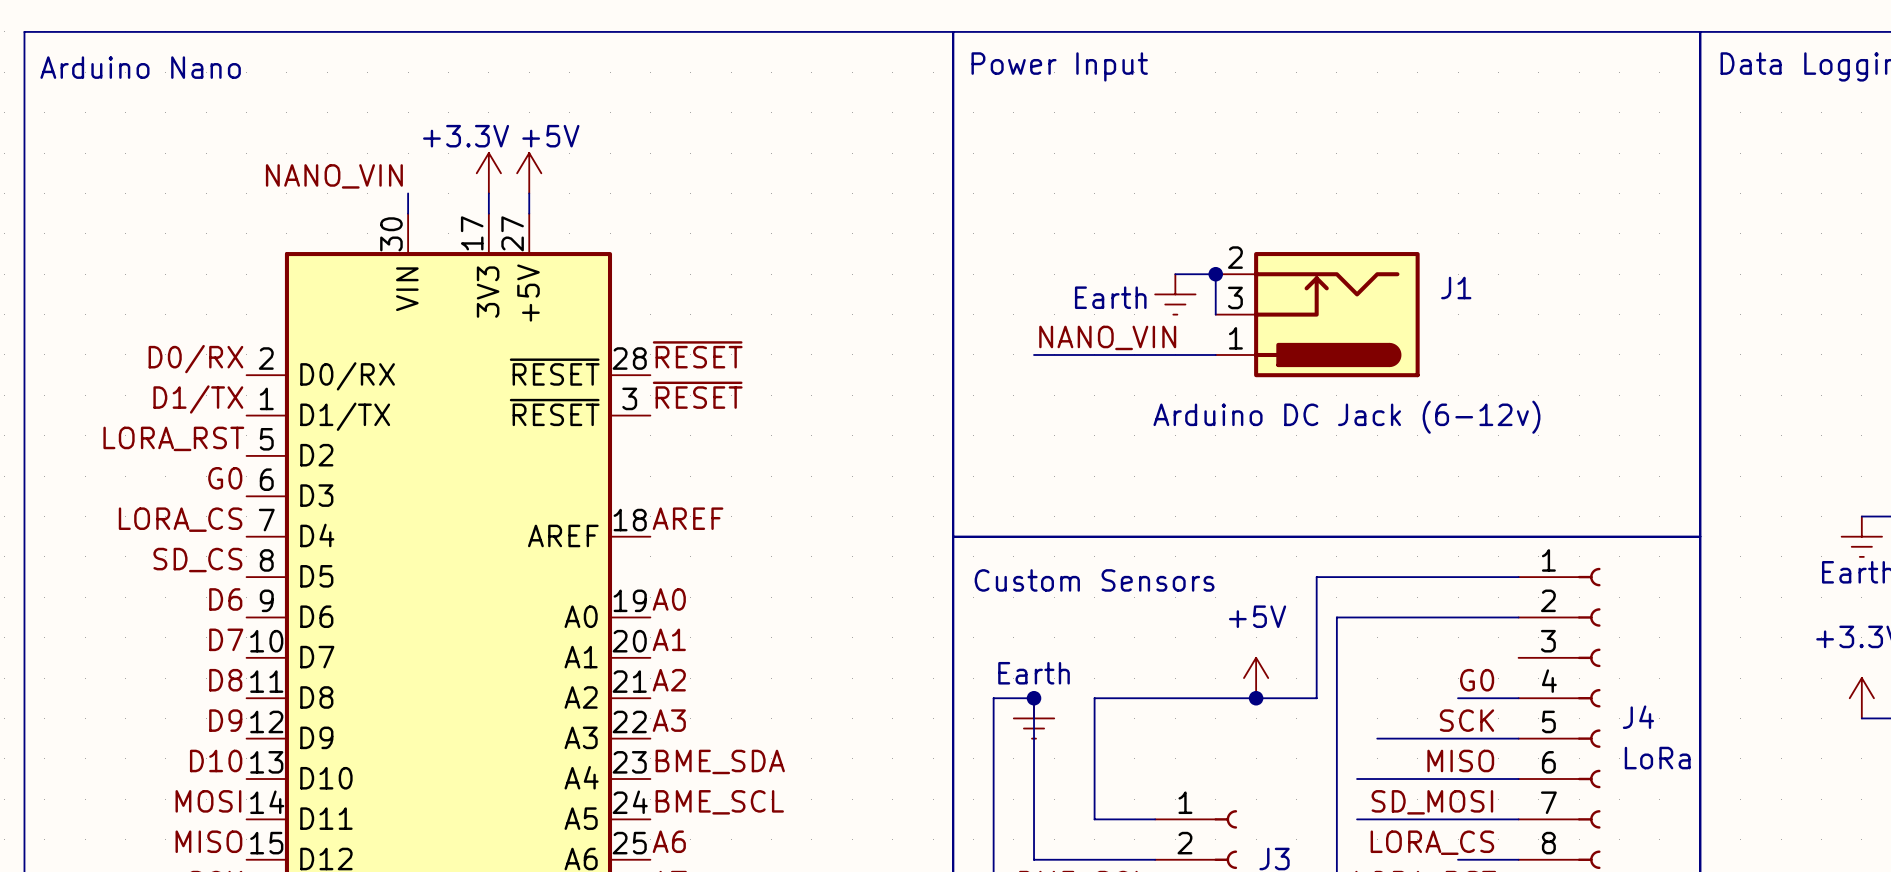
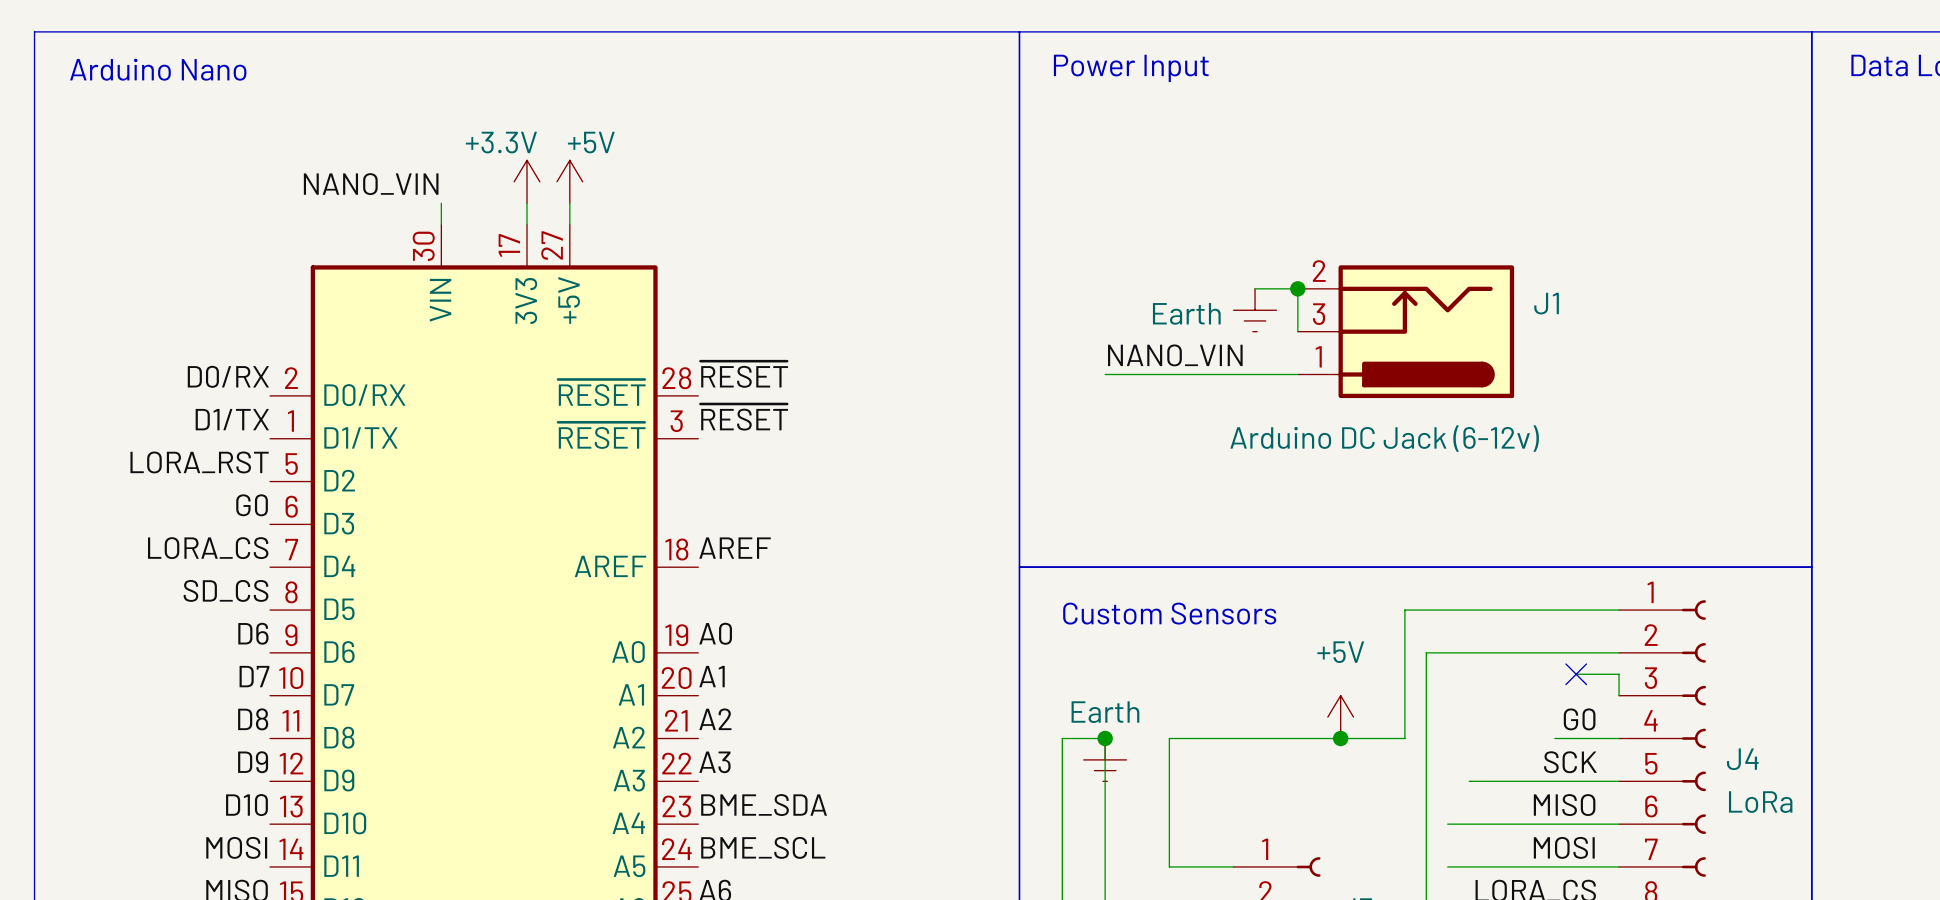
wire: none -> (1576, 674) (1619, 674) (1619, 695)
no-connect mark: none -> (1576, 674)
label: SD_MOSI (1432, 802) -> MOSI (1564, 847)

